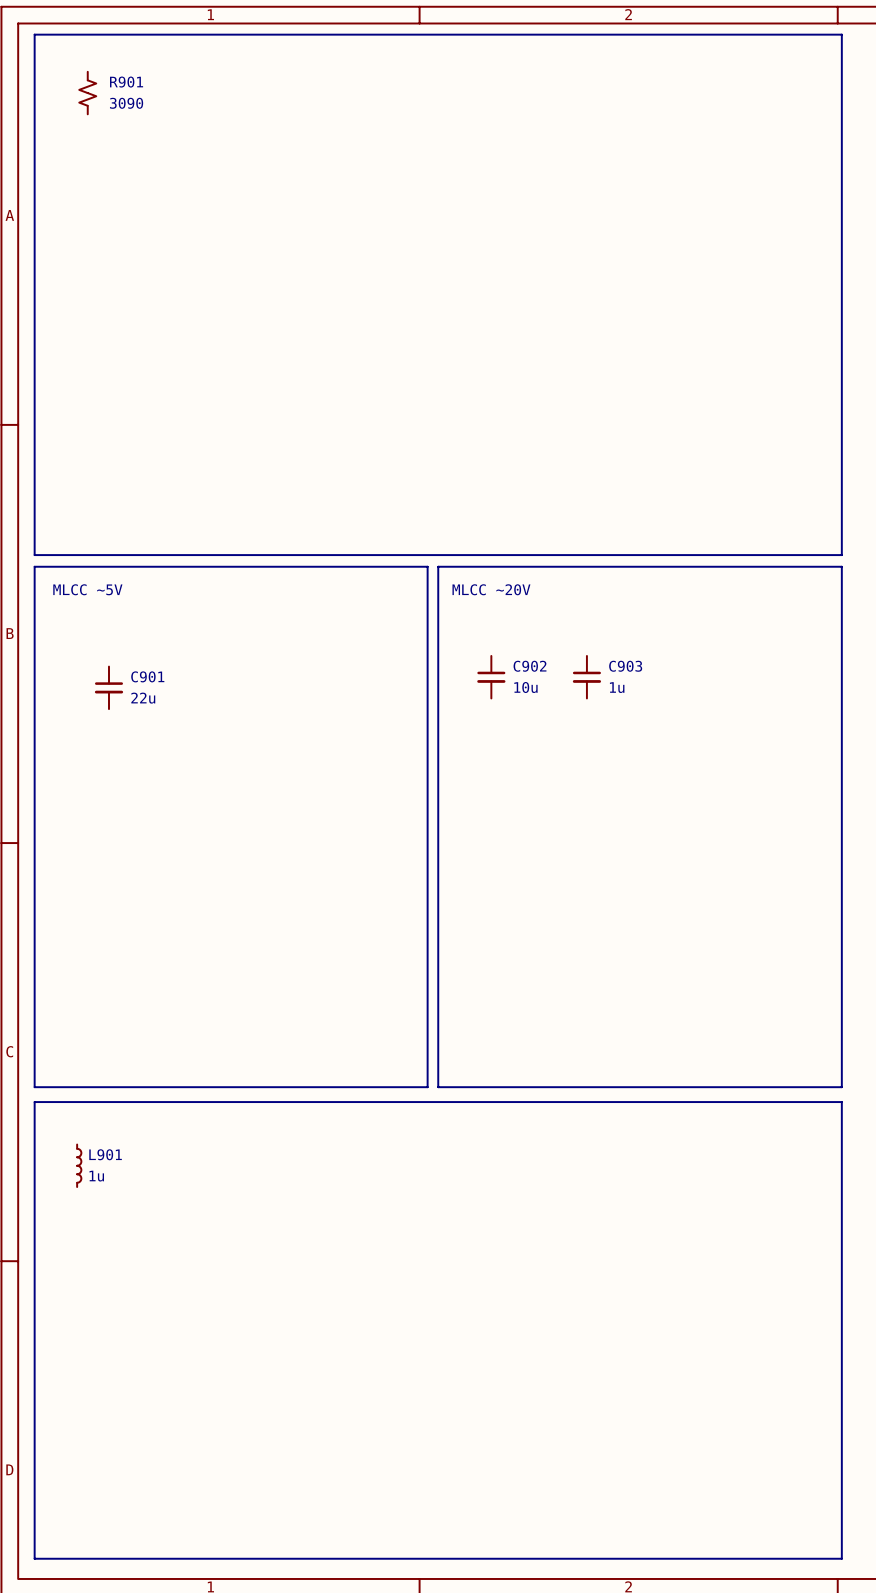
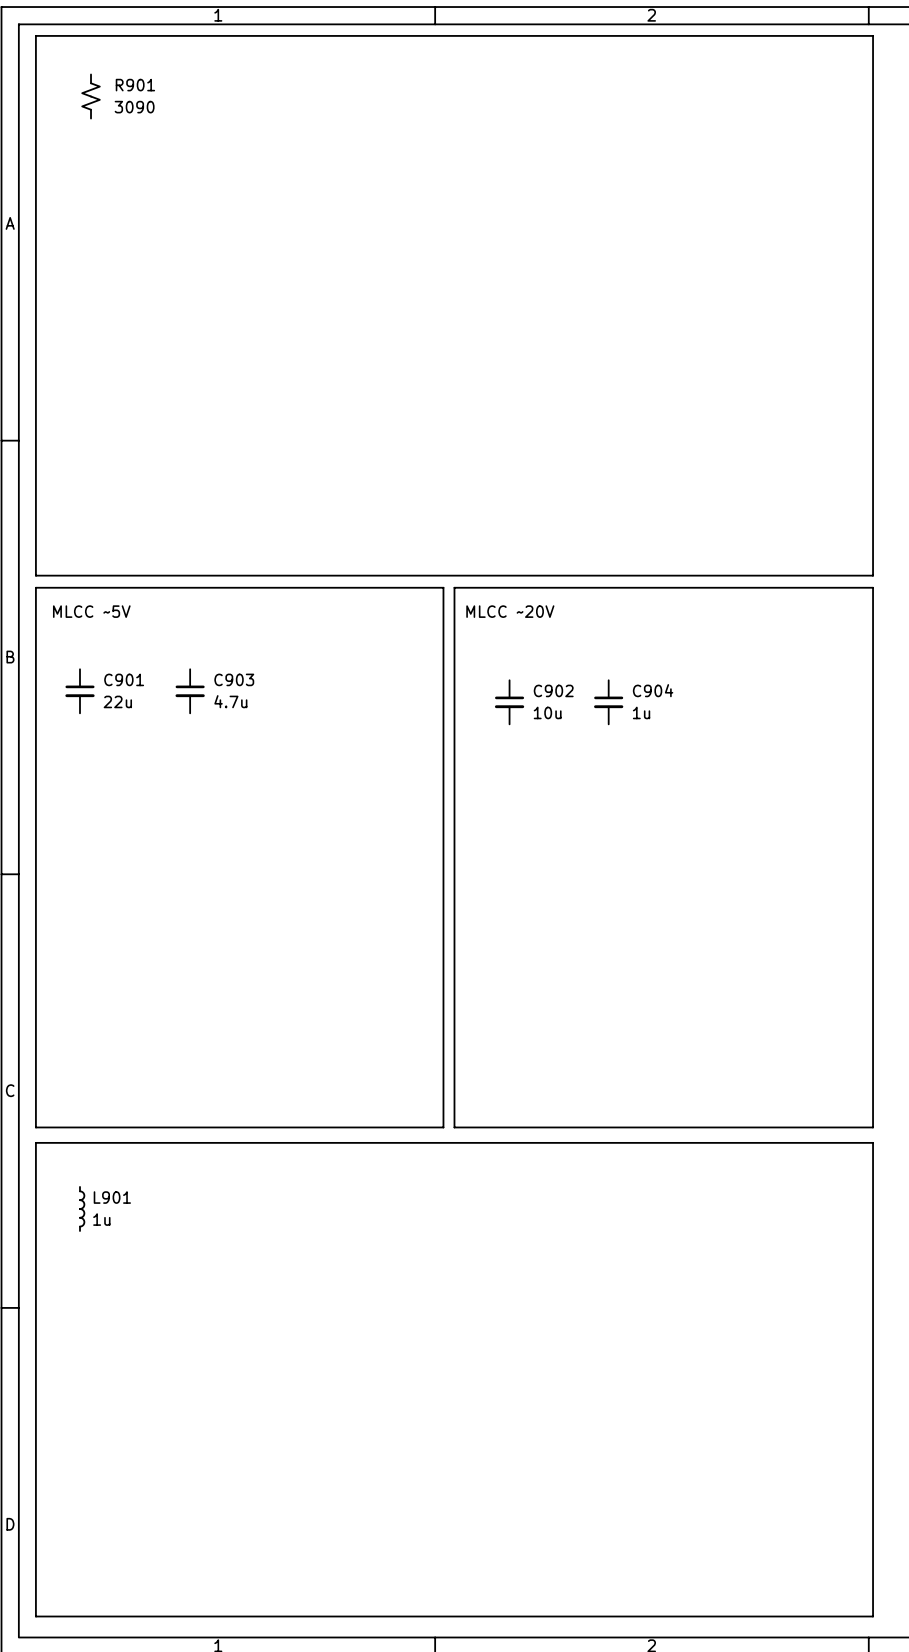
C903: none -> 4.7u (190, 691)
C903 name: C903 (625, 666) -> C904 (653, 690)
C901 position: (109, 687) -> (79, 691)

